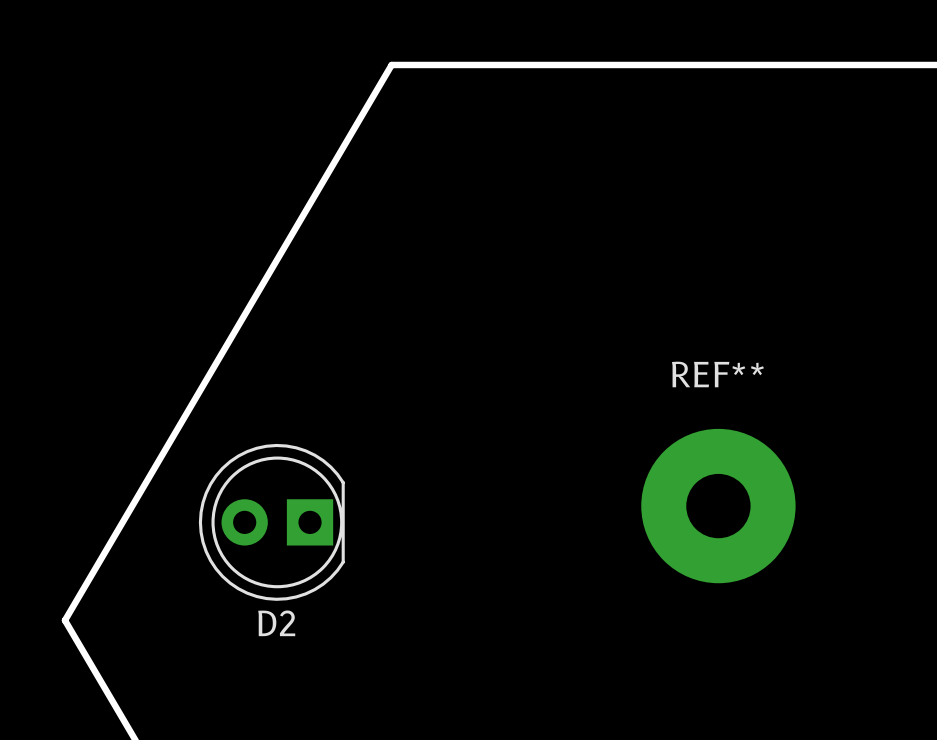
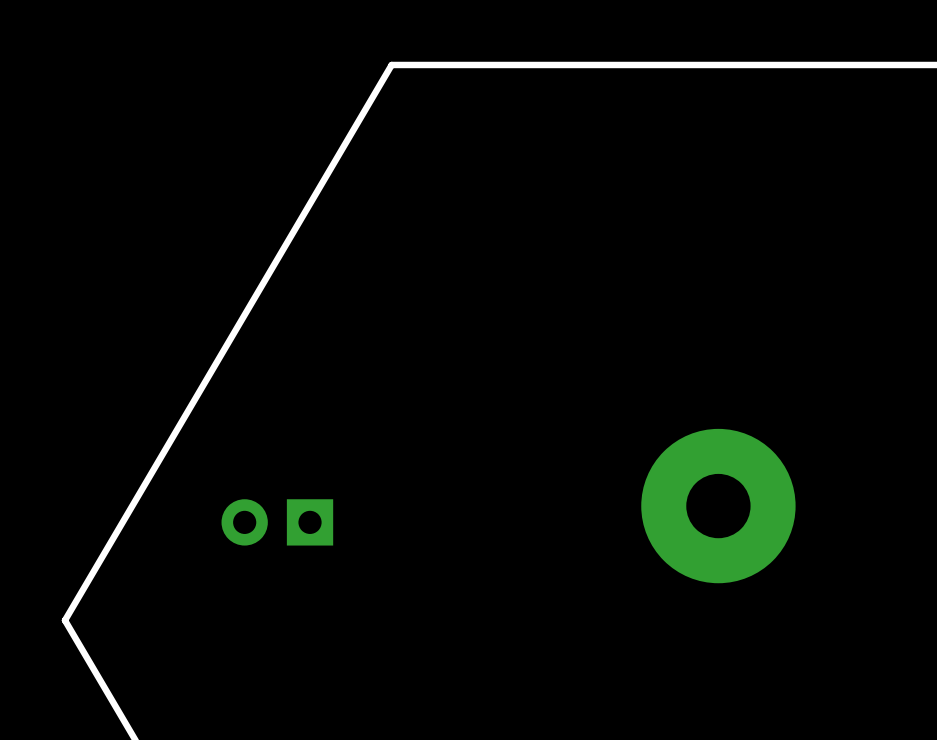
REF** name: REF** (717, 374) -> none
D2 side: top (271, 522) -> bottom (277, 522)

